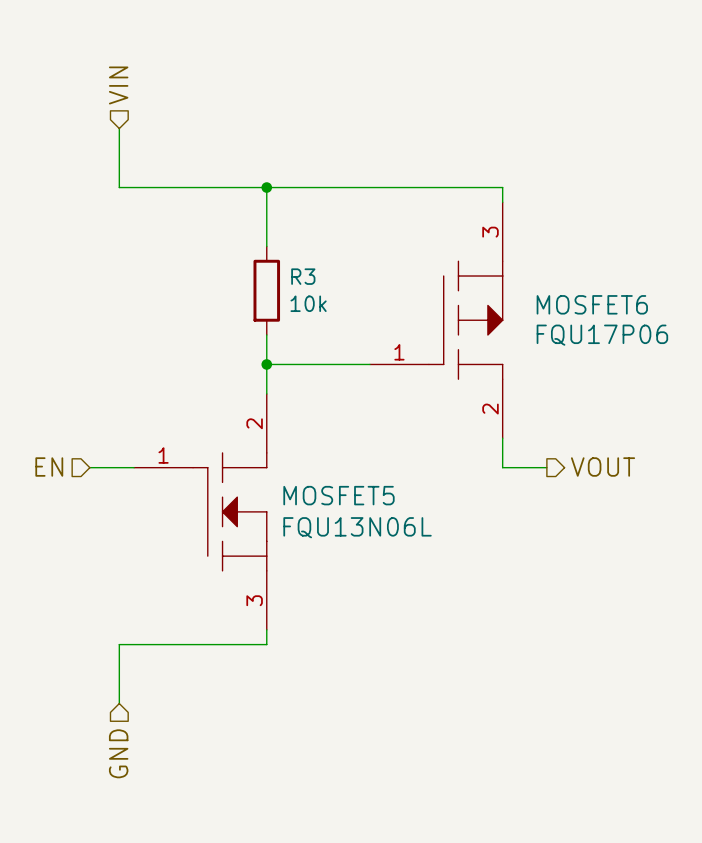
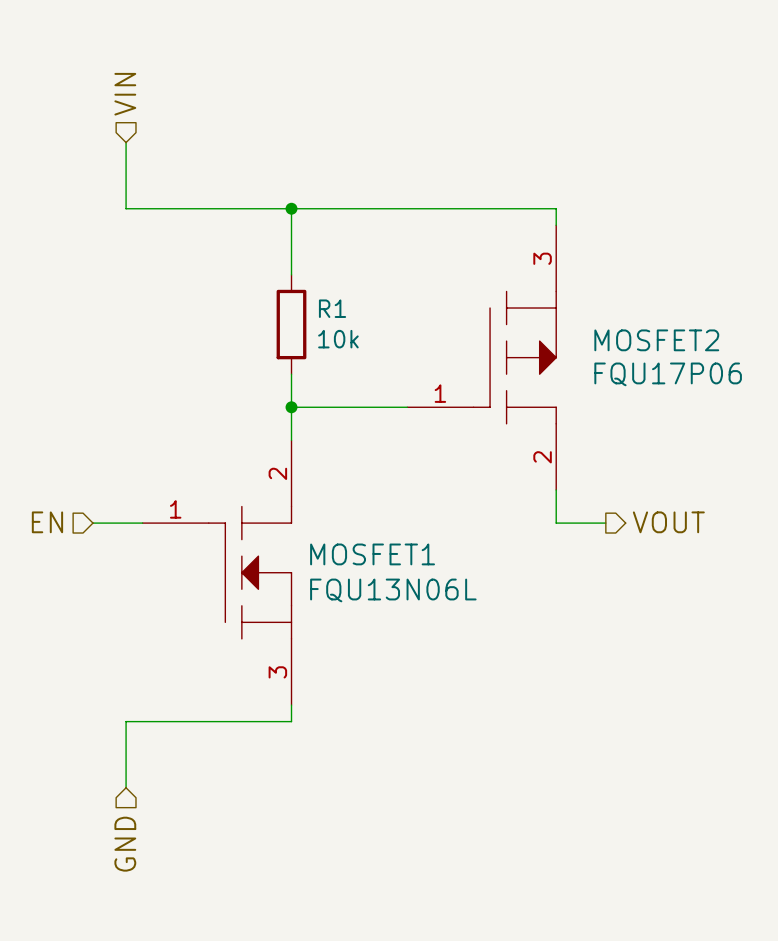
R3 name: R3 (303, 276) -> R1 (332, 308)
MOSFET6 name: MOSFET6 (592, 304) -> MOSFET2 (656, 340)
MOSFET5 name: MOSFET5 (338, 495) -> MOSFET1 (372, 554)

